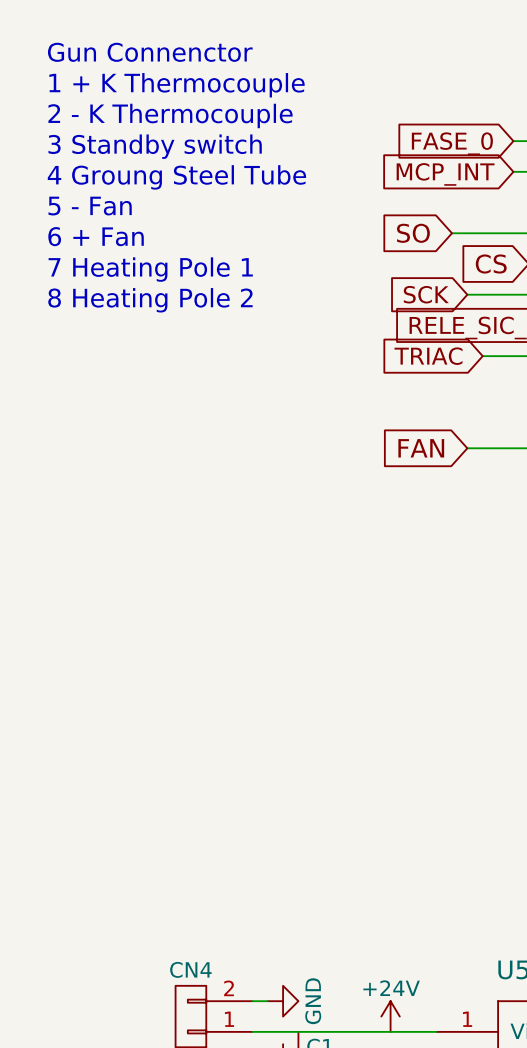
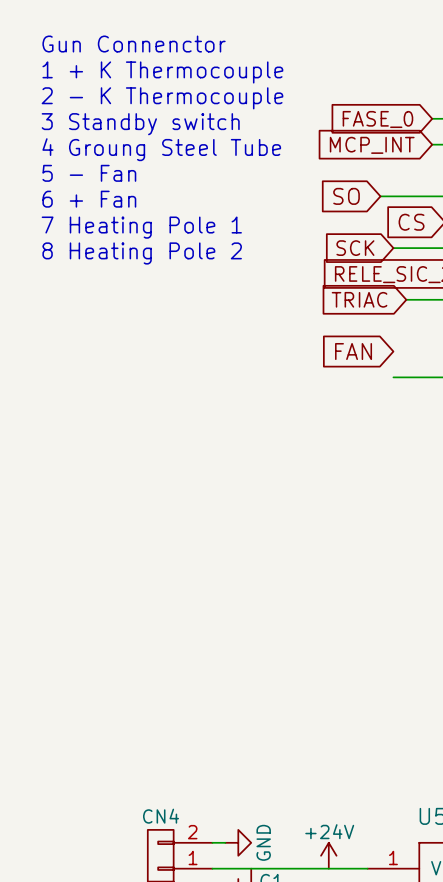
global label position: FAN (421, 448) -> FAN (353, 351)

